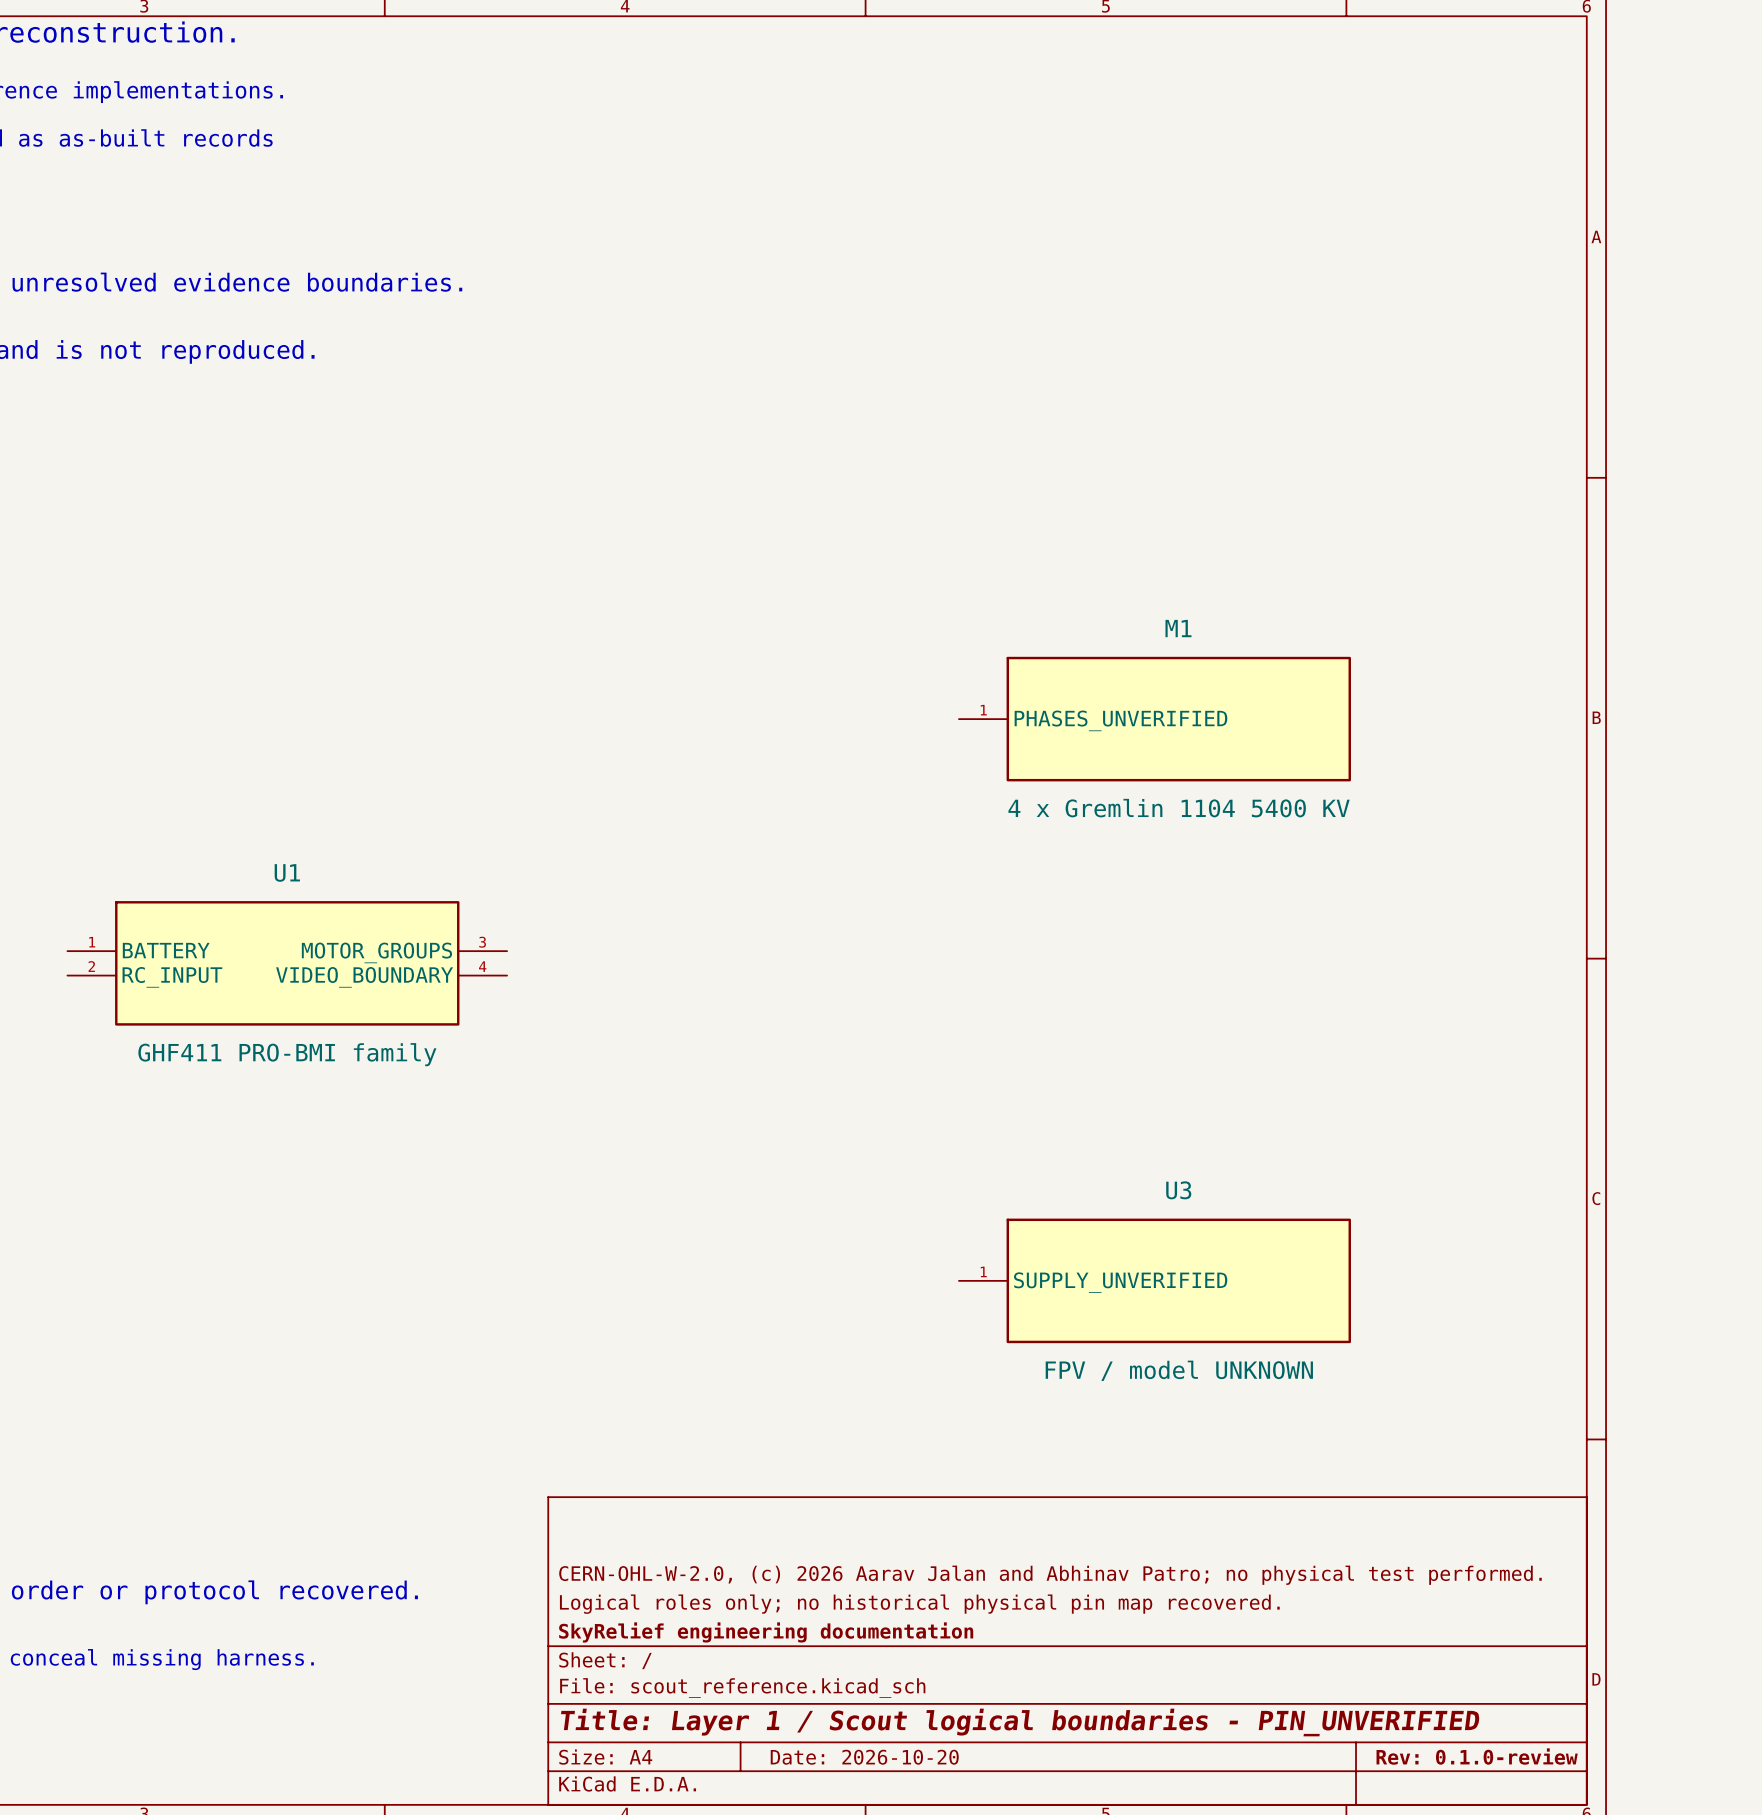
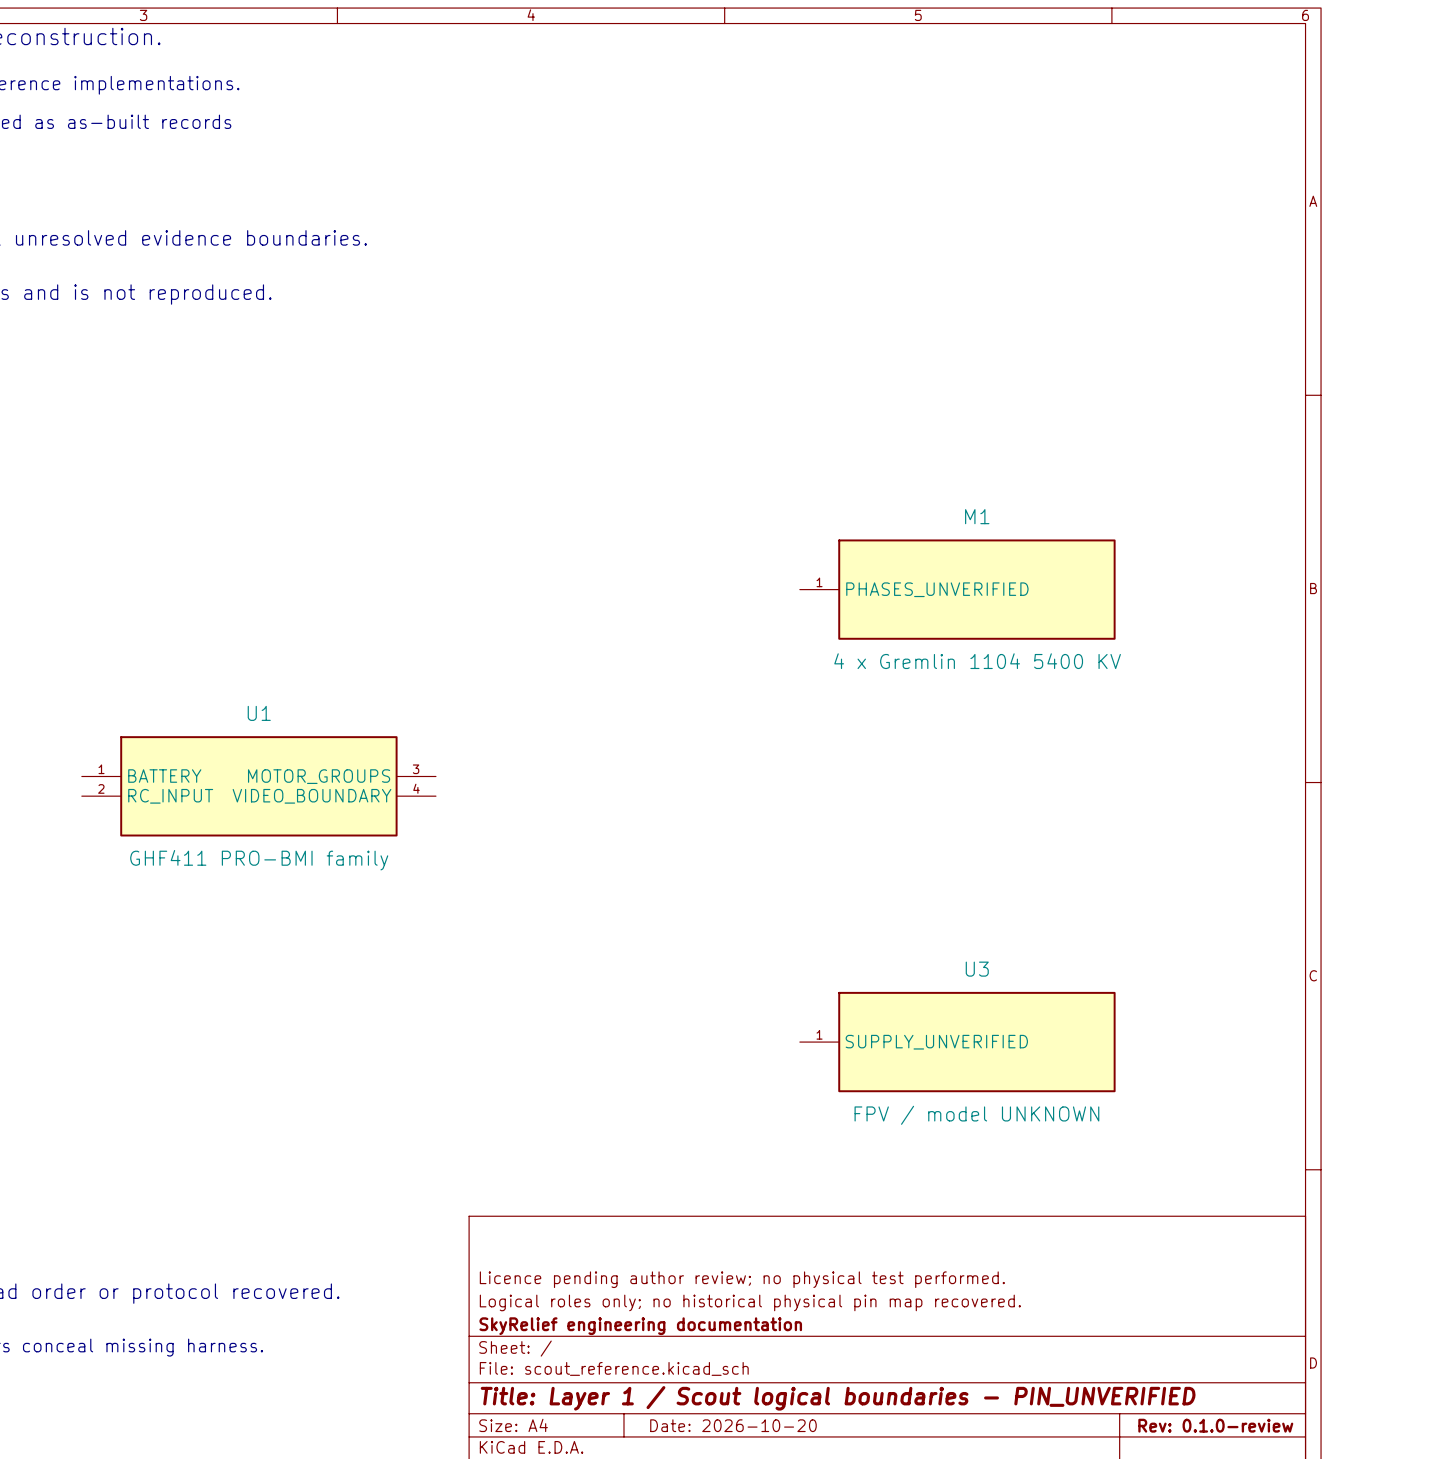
title block: CERN-OHL-W-2.0, (c) 2026 Aarav Jalan and Abhinav Patro; no physical test performed. (1050, 1575) -> Licence pending author review; no physical test performed. (742, 1279)

